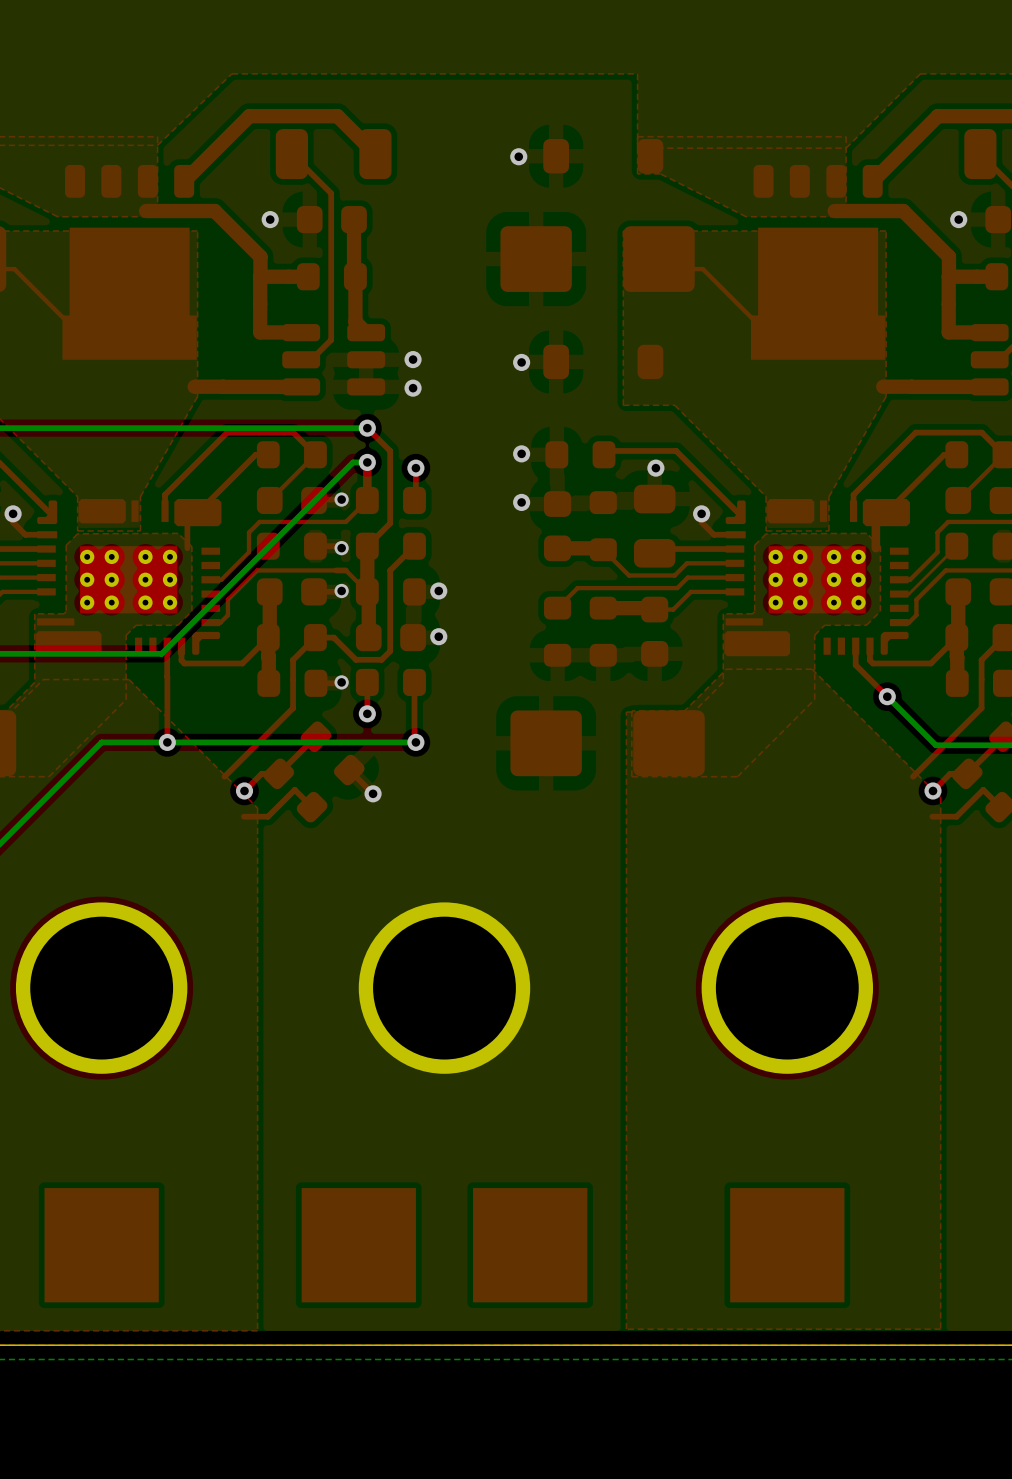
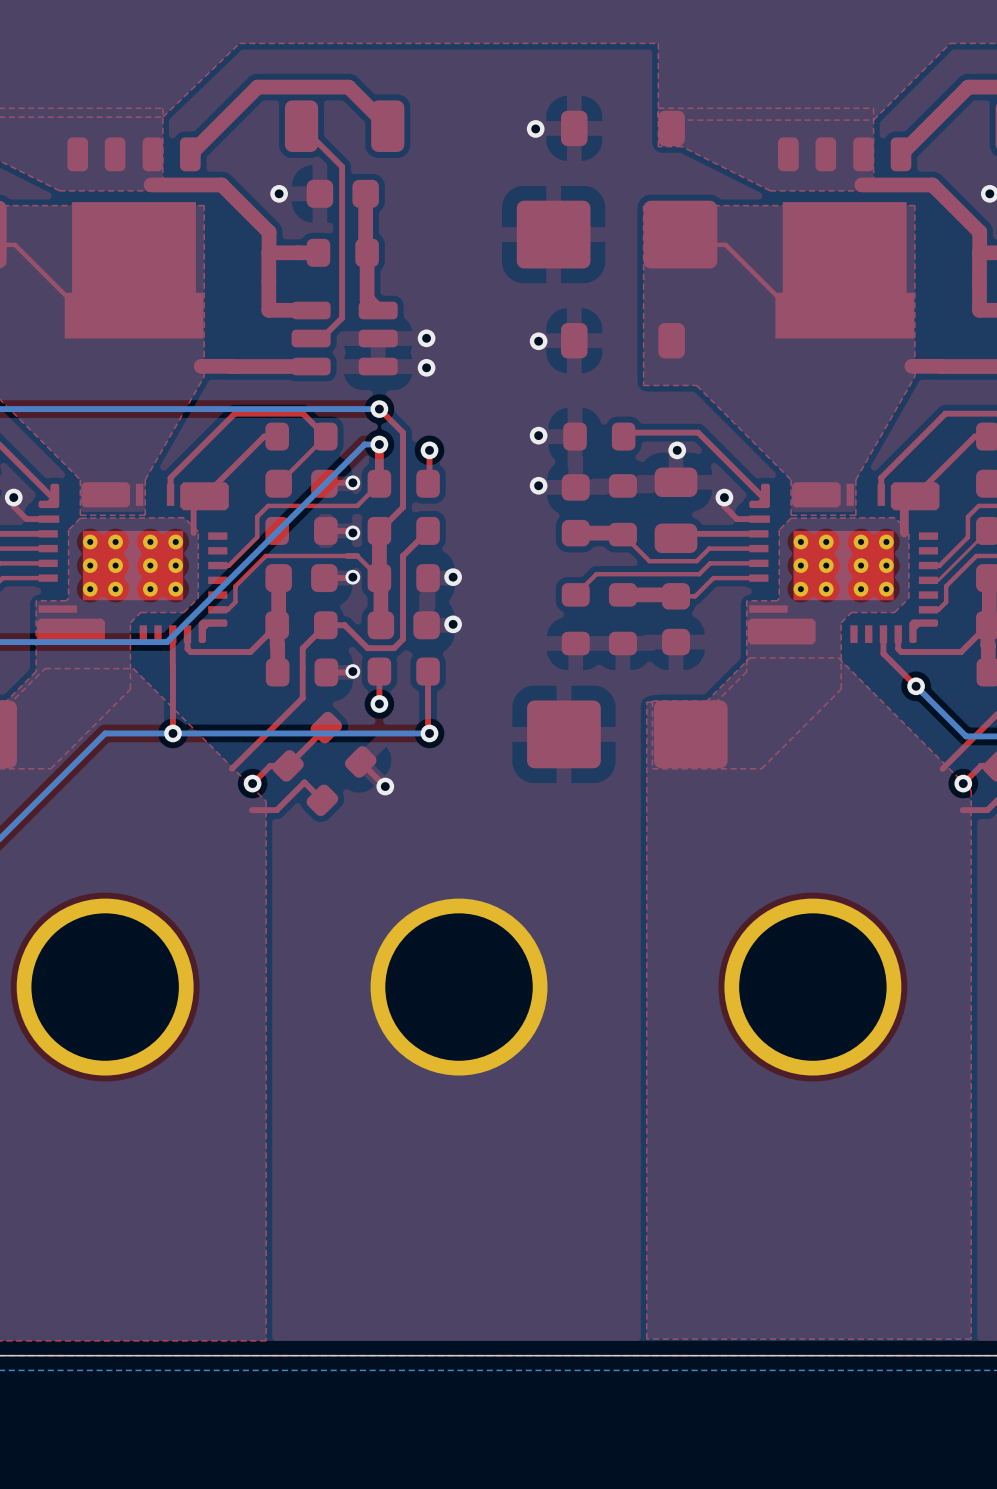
part: (101, 1245) -> none
part: (358, 1245) -> none
part: (530, 1245) -> none
part: (787, 1245) -> none

